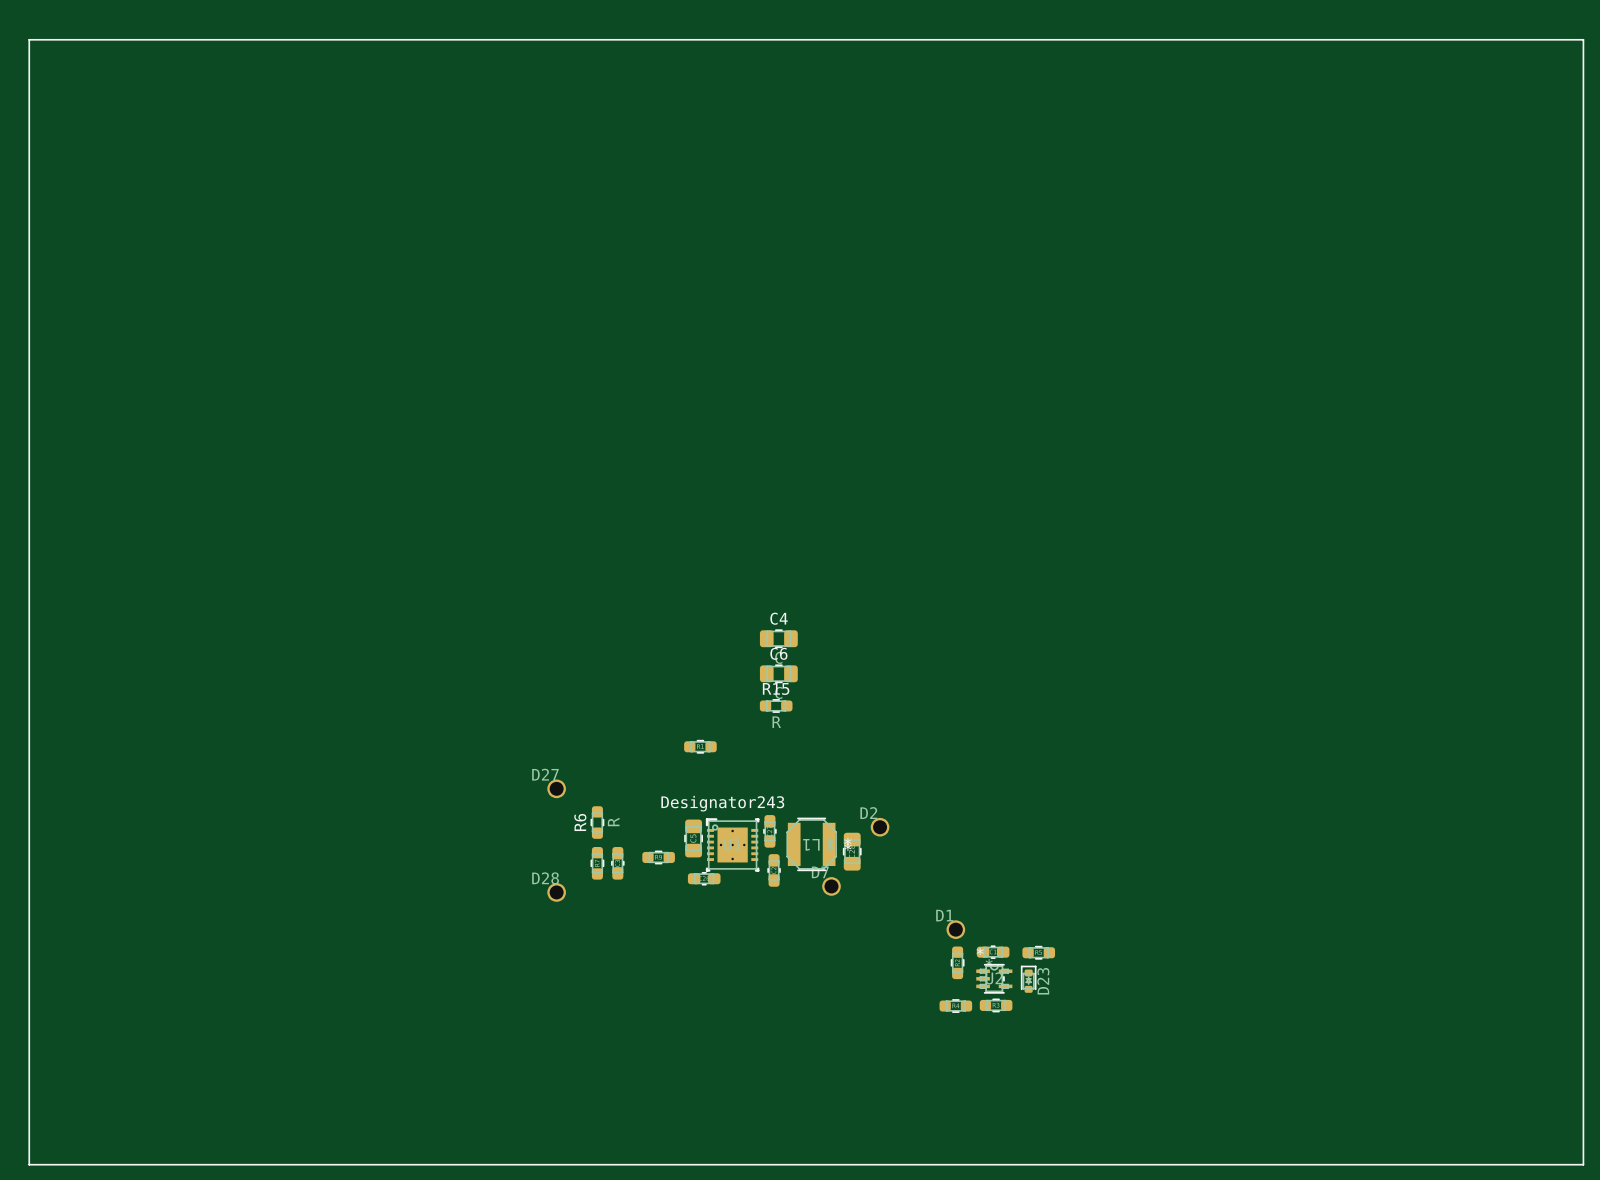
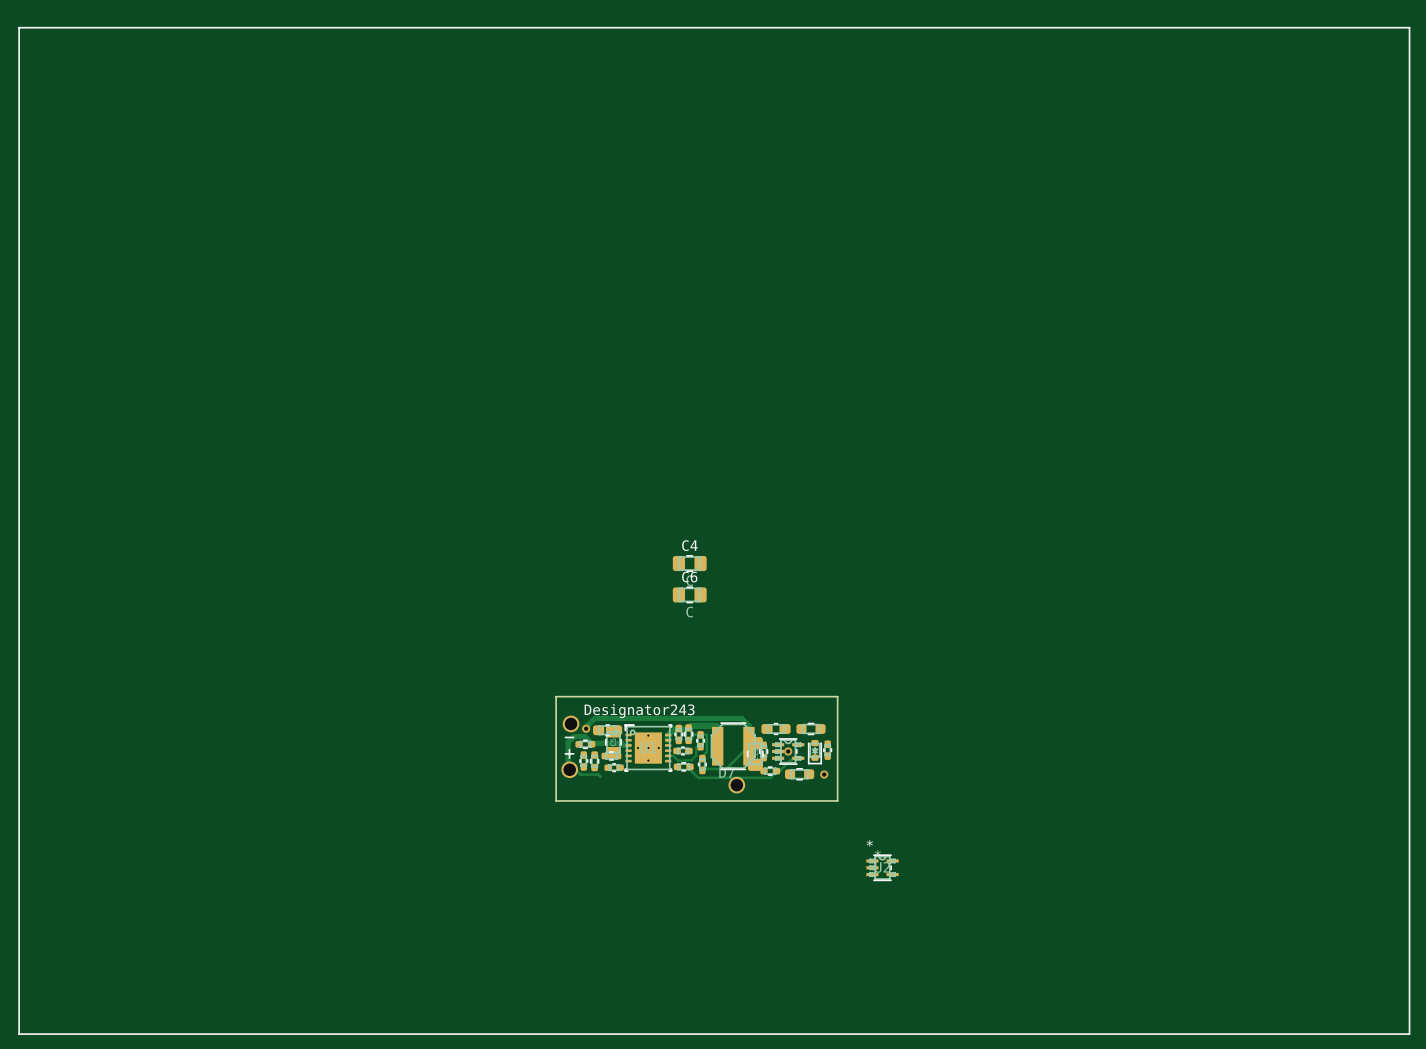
R15: R (776, 705) -> none
part: (700, 746) -> none
board edge: none -> (556, 696) (837, 696) (837, 800) (556, 800) (556, 696)
D27: (556, 788) -> none
part: none -> (571, 723)
R6: R (597, 822) -> none
track: none -> (586, 728) (594, 718) (741, 718) (748, 725) (748, 746) (726, 768) (706, 768) (704, 766)
via: none -> (586, 728)
part: none -> (776, 728)
part: none -> (810, 728)
part: none -> (607, 730)
D2: (880, 827) -> none
part: none -> (678, 734)
part: none -> (688, 734)
part: (769, 831) -> none
line: none -> (565, 737) (573, 737)
track: none -> (668, 740) (668, 735) (674, 728) (687, 728) (690, 725) (716, 725) (717, 746)
track: none -> (688, 740) (694, 734) (705, 734) (706, 752) (704, 754)
part: none -> (700, 740)
track: none -> (700, 743) (696, 747) (696, 755) (691, 760) (678, 760) (673, 755) (668, 755)
part: none -> (585, 744)
track: none -> (628, 745) (621, 743) (591, 743) (584, 736) (574, 736) (568, 742) (568, 769)
part: none -> (733, 746)
L1: (811, 844) -> none
line: none -> (569, 749) (569, 758)
part: none -> (827, 750)
part: none -> (682, 750)
part: none -> (763, 751)
part: none -> (788, 751)
via: none -> (788, 751)
part: none -> (814, 752)
line: none -> (565, 753) (573, 753)
part: none -> (611, 756)
part: (658, 857) -> none
track: none -> (798, 759) (791, 759) (770, 777) (698, 777) (691, 770) (691, 767)
part: none -> (583, 761)
part: none -> (594, 761)
part: (597, 863) -> none
part: (617, 863) -> none
part: none -> (702, 764)
track: none -> (572, 766) (580, 774) (598, 774) (600, 776)
part: none -> (614, 767)
part: none -> (683, 766)
part: none -> (569, 769)
part: (774, 870) -> none
part: none -> (770, 771)
part: none -> (799, 774)
via: none -> (824, 774)
part: (704, 878) -> none
D28: (556, 892) -> none
D1: (955, 929) -> none
part: (993, 952) -> none
part: (1038, 952) -> none
part: (957, 962) -> none
D23: (1028, 979) -> none
part: (996, 1005) -> none
part: (955, 1006) -> none

